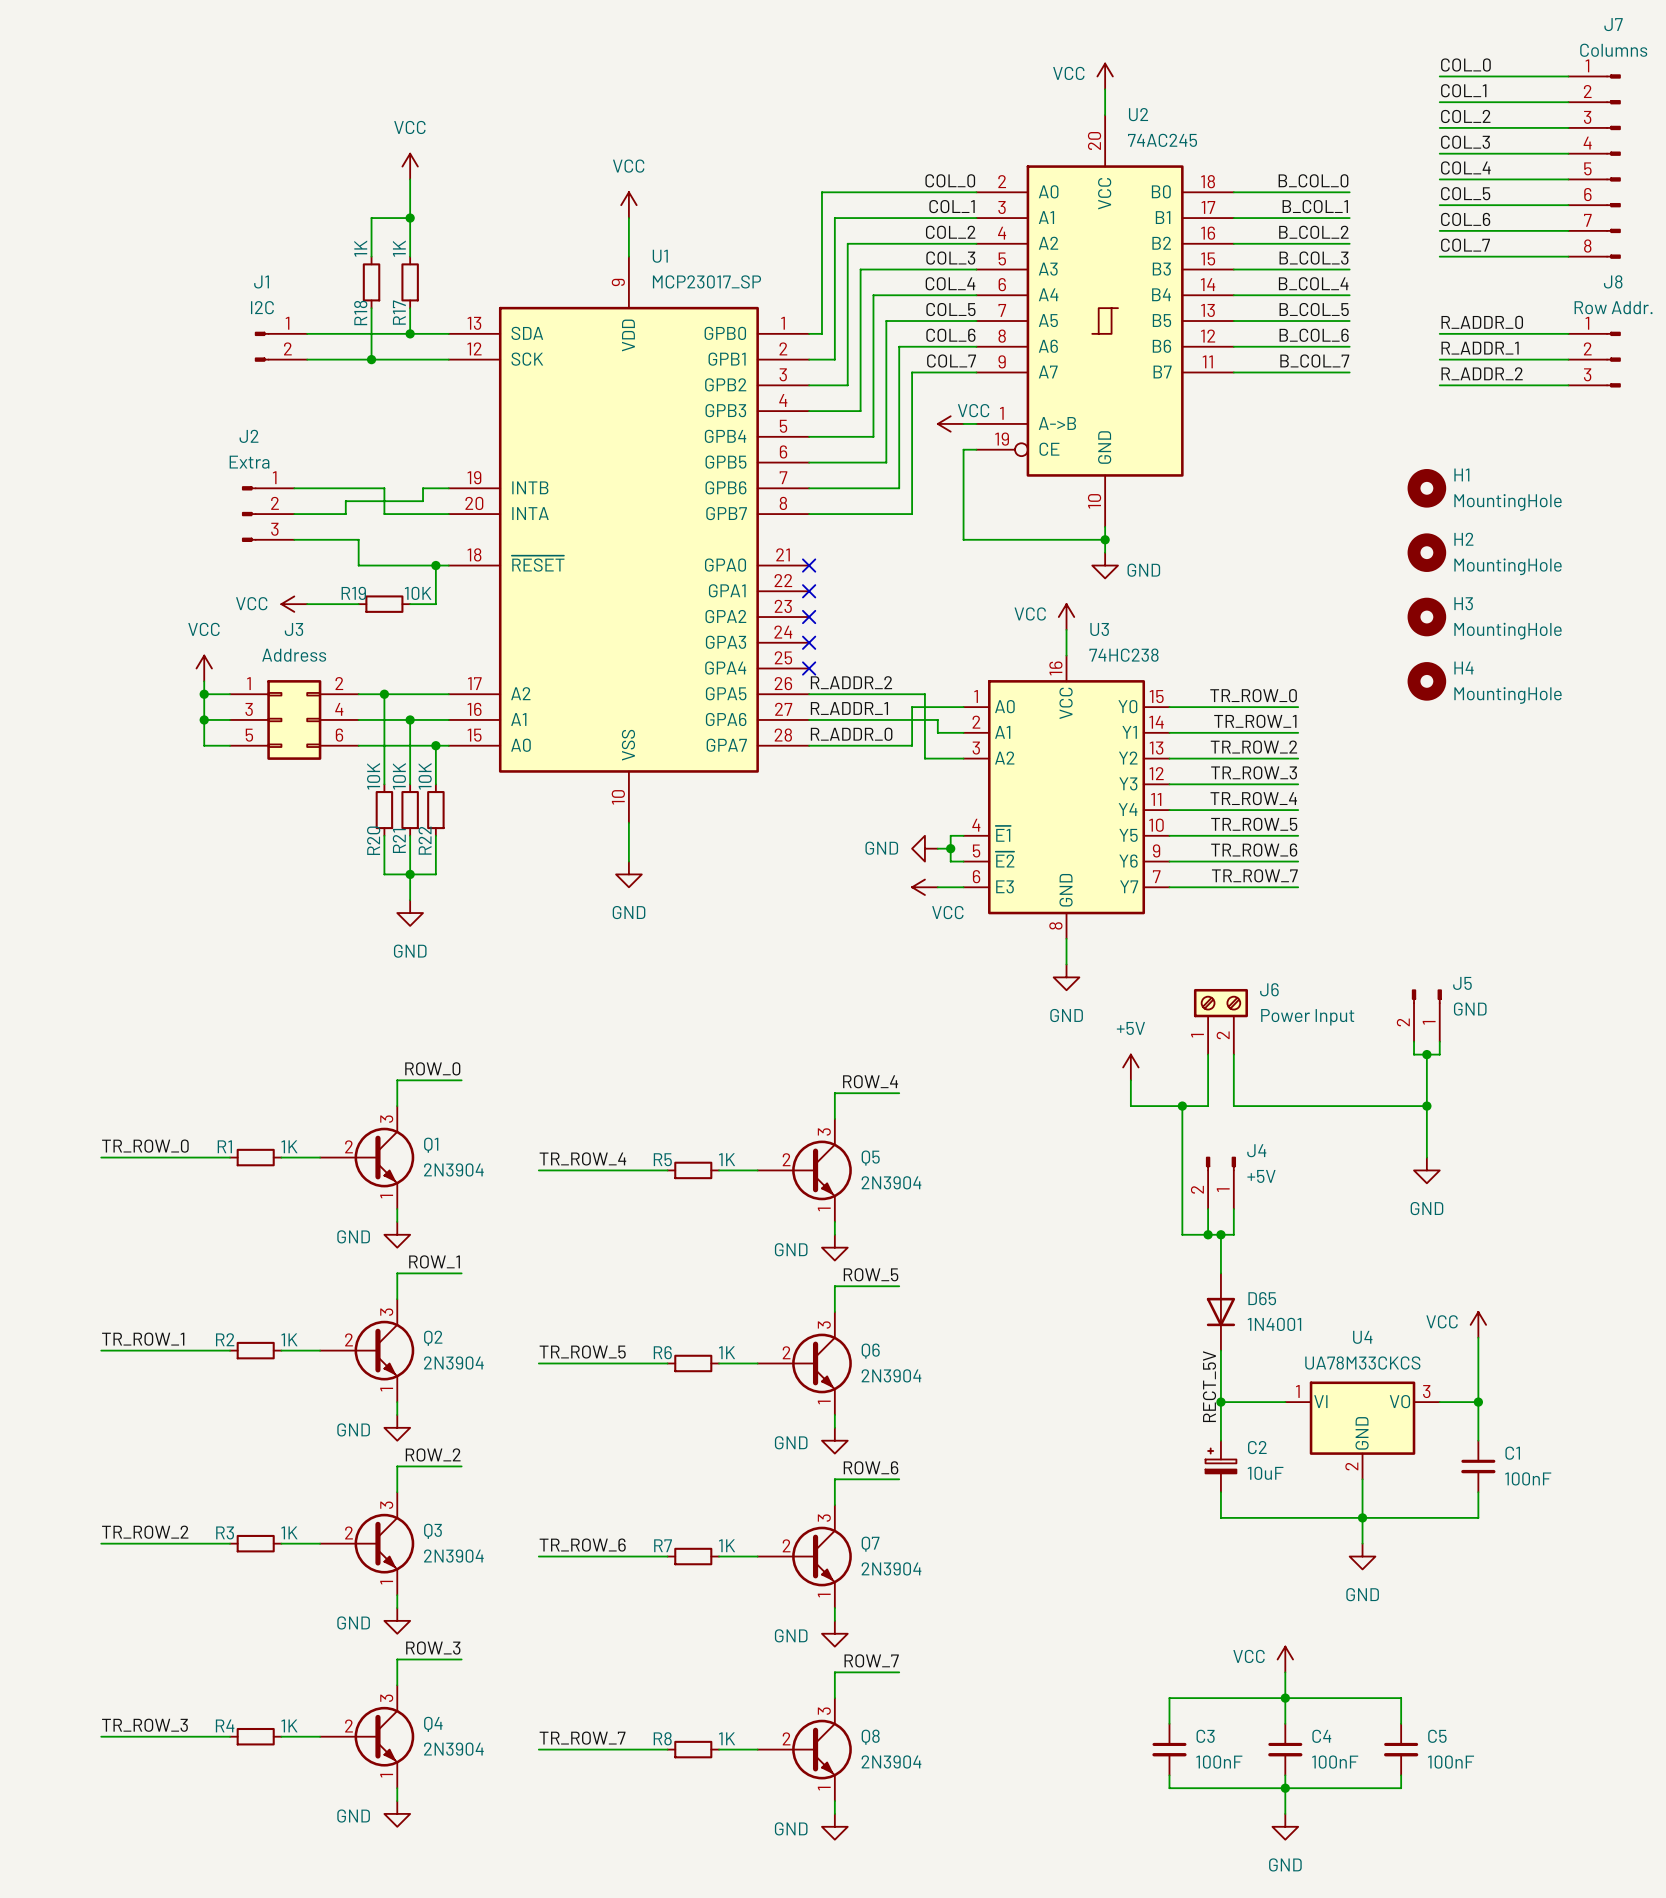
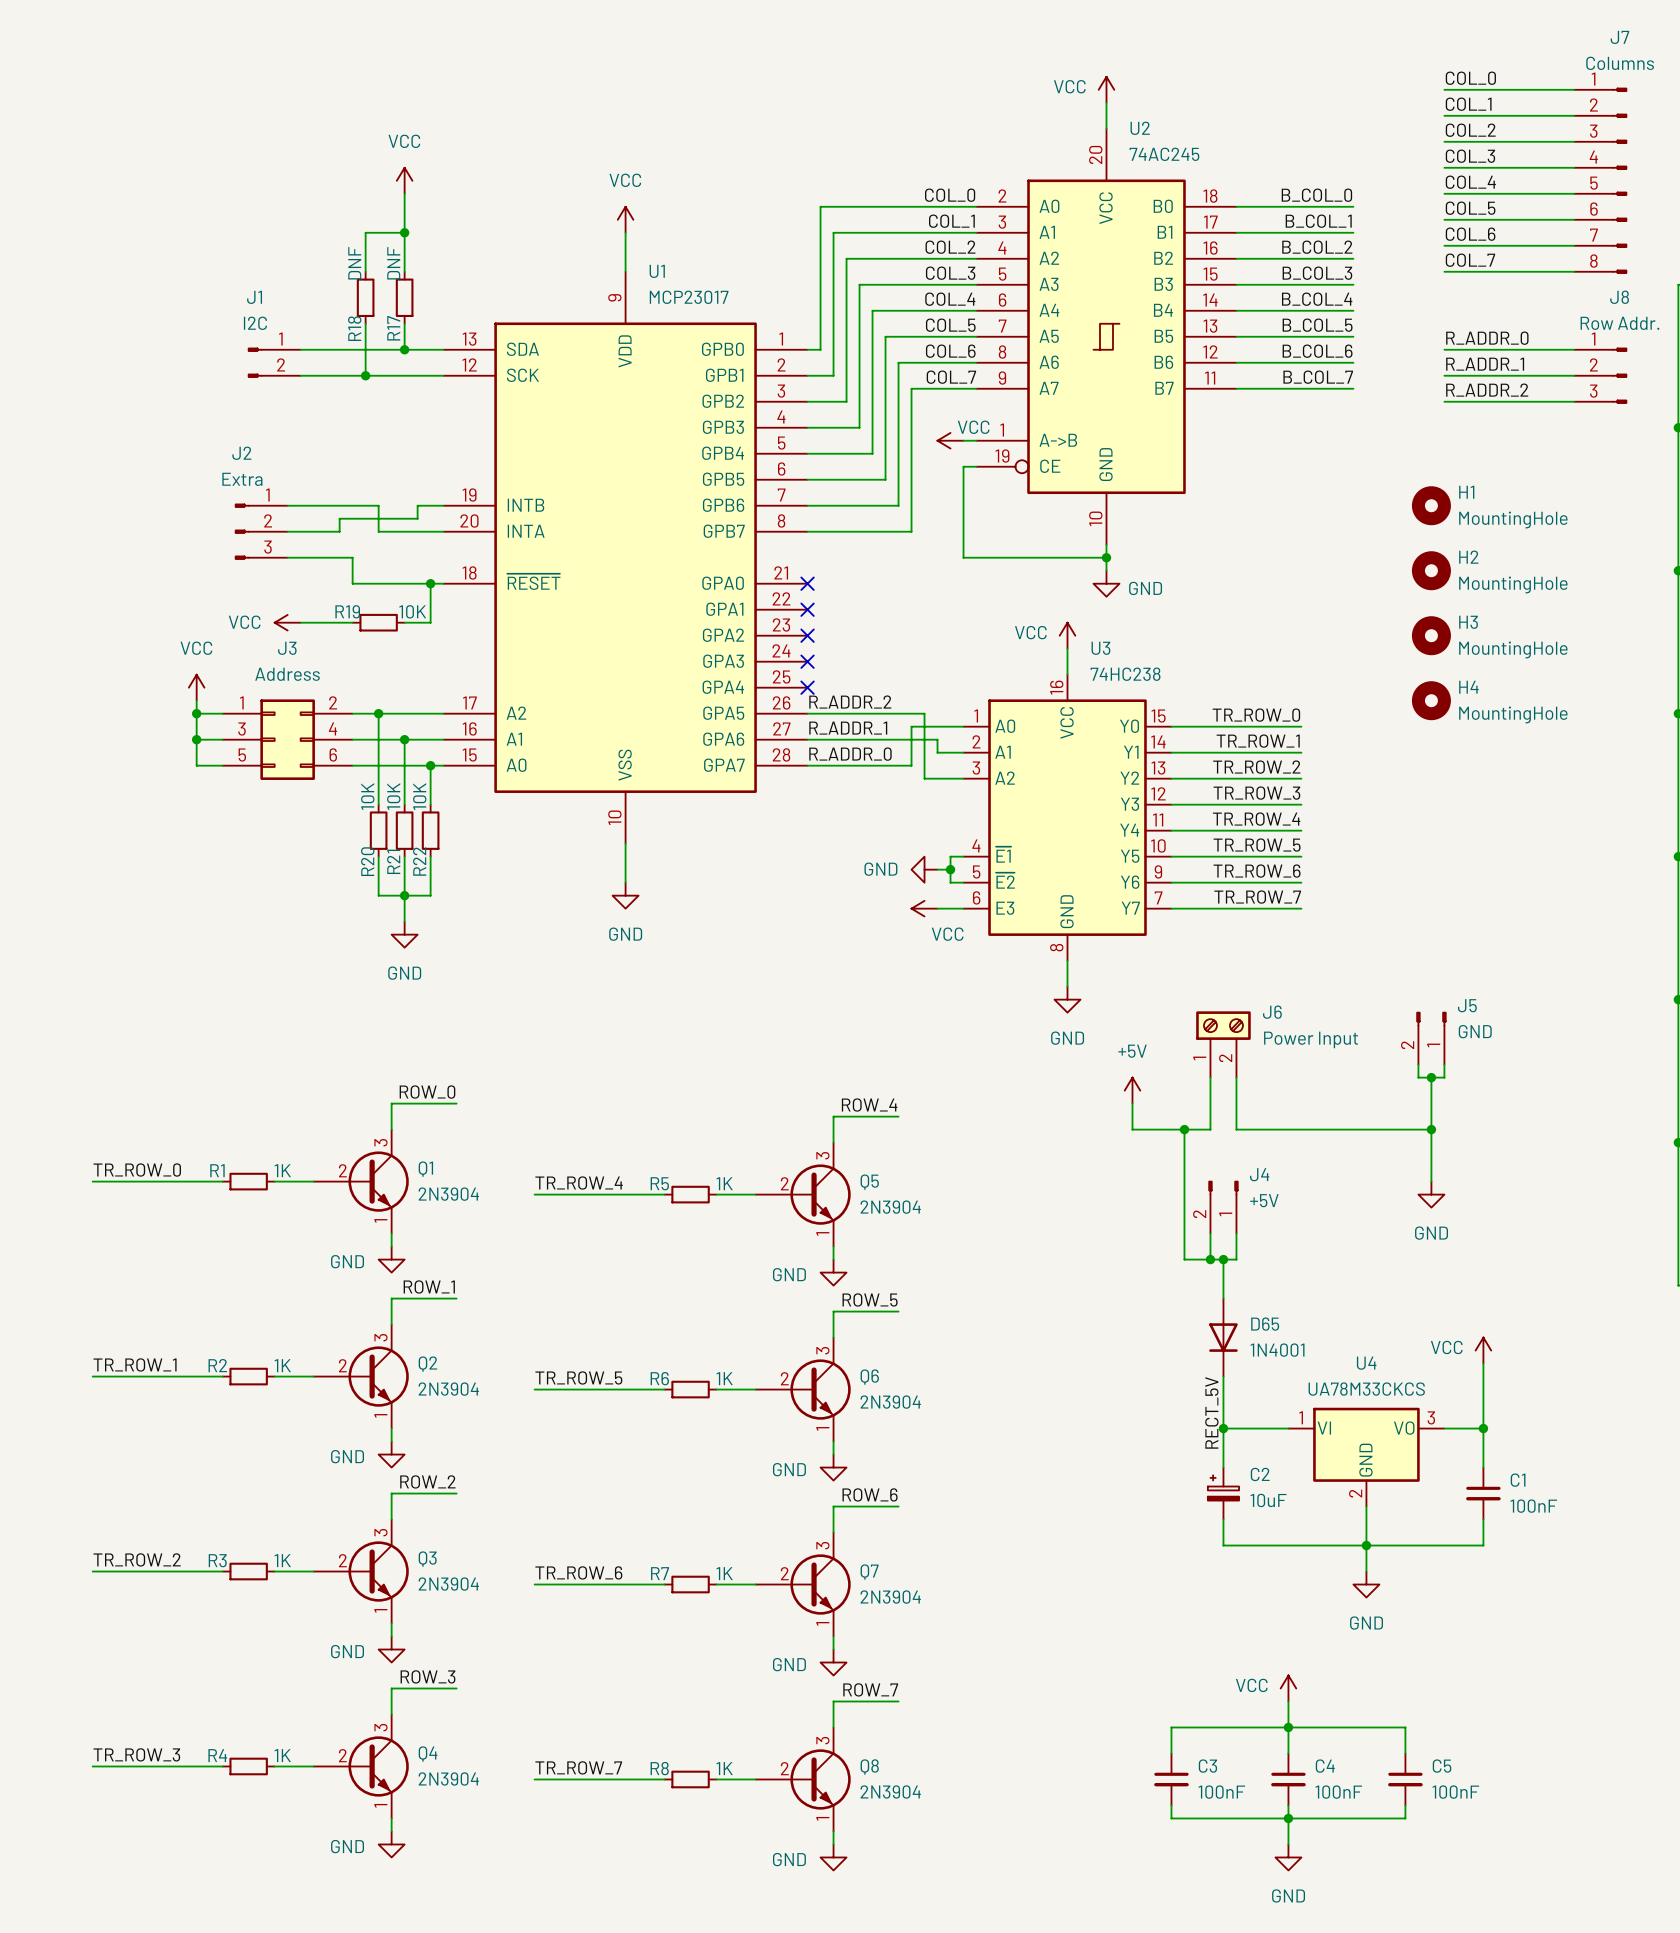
R18 value: 1K (360, 248) -> DNF (354, 263)
R17 value: 1K (399, 248) -> DNF (393, 263)
U1 value: MCP23017_SP (706, 281) -> MCP23017 (689, 297)

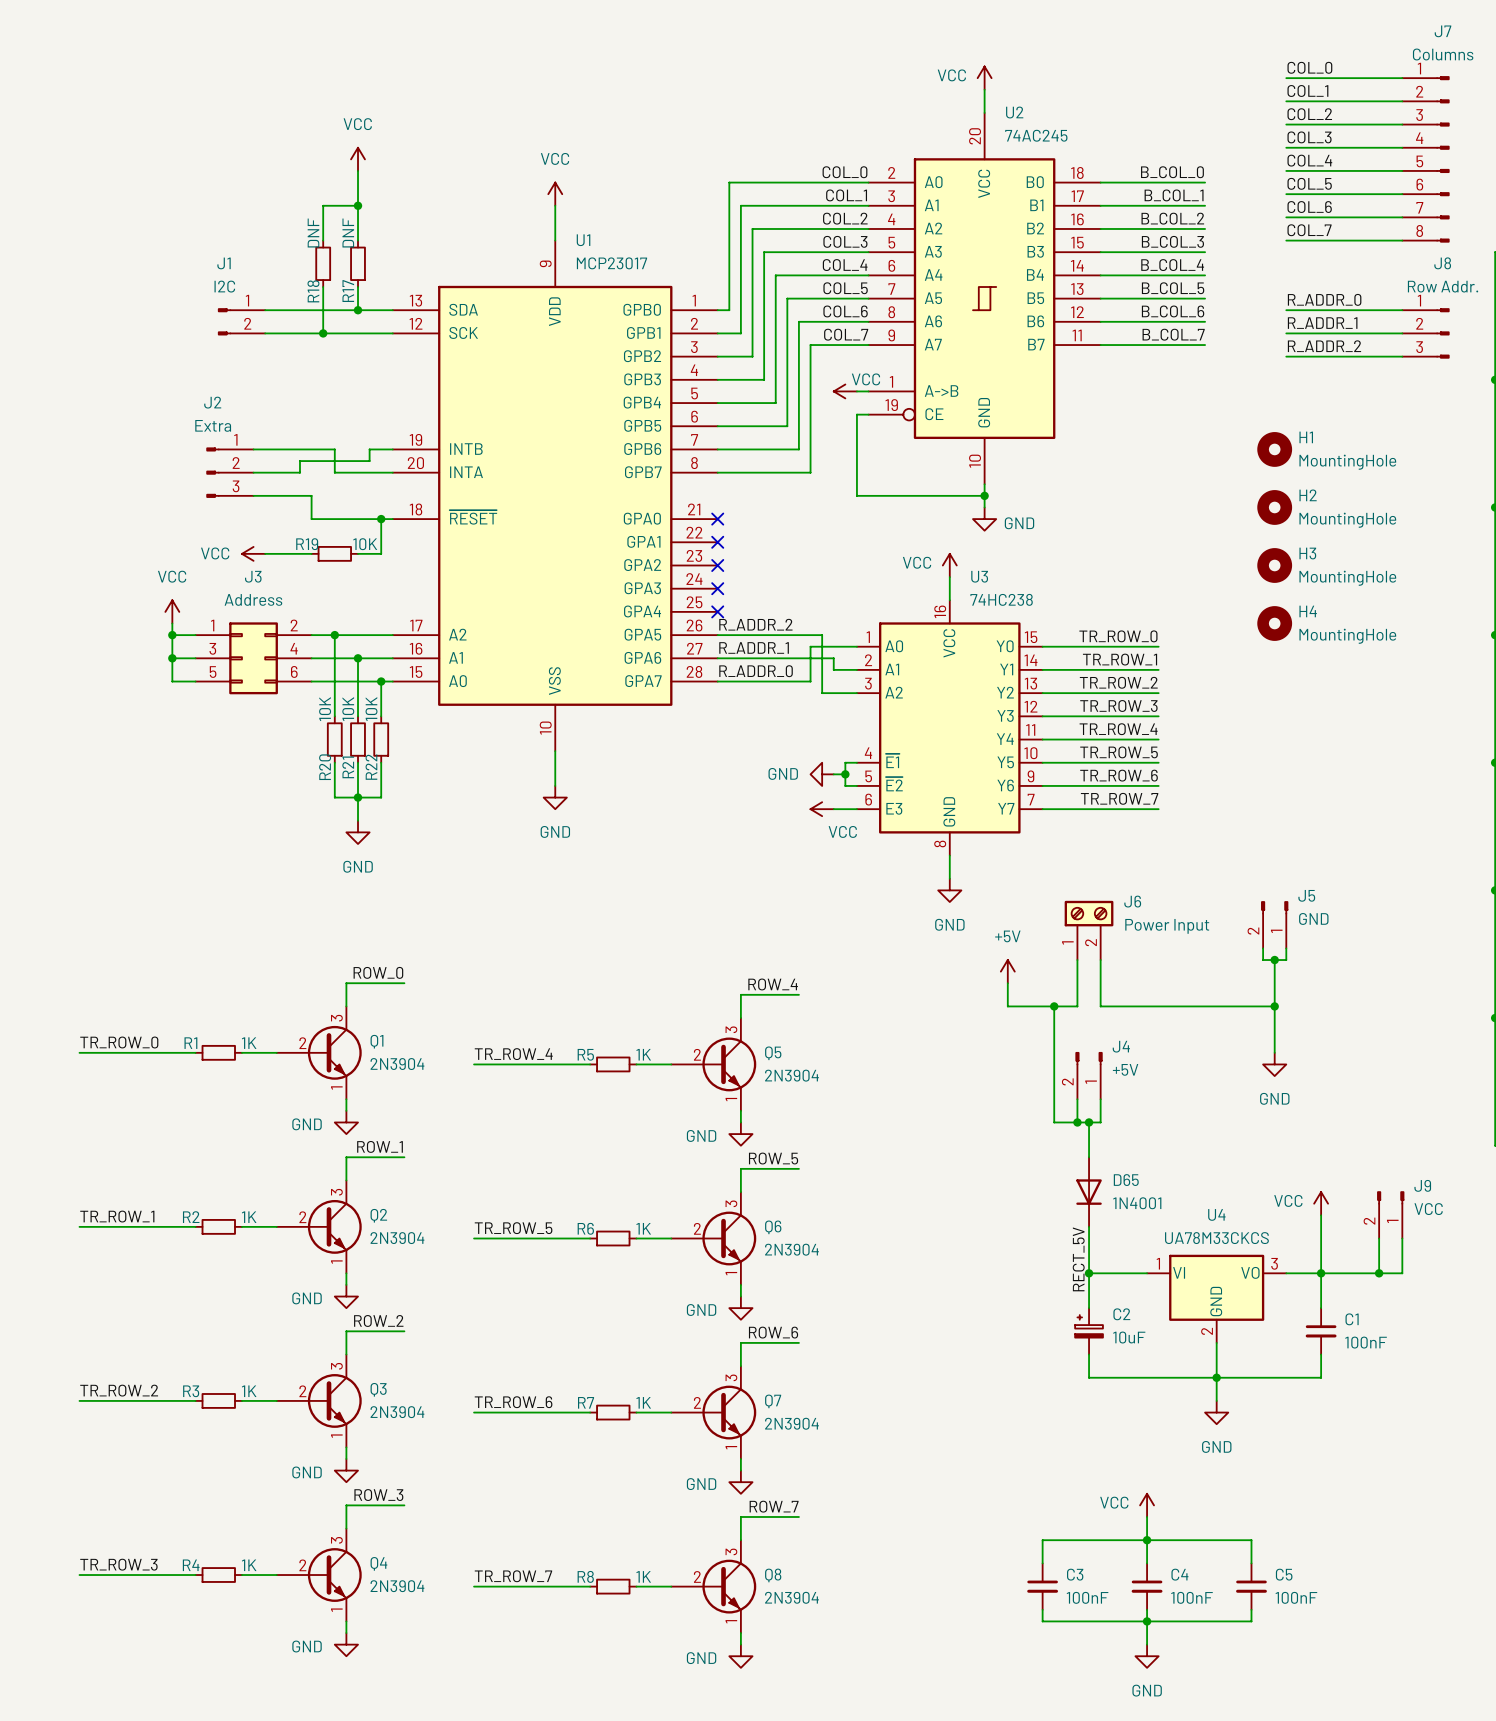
J9: none -> VCC (1390, 1214)
wire: none -> (1379, 1238) (1379, 1273)
wire: none -> (1402, 1238) (1402, 1273) (1321, 1273)
junction: none -> (1379, 1273)

